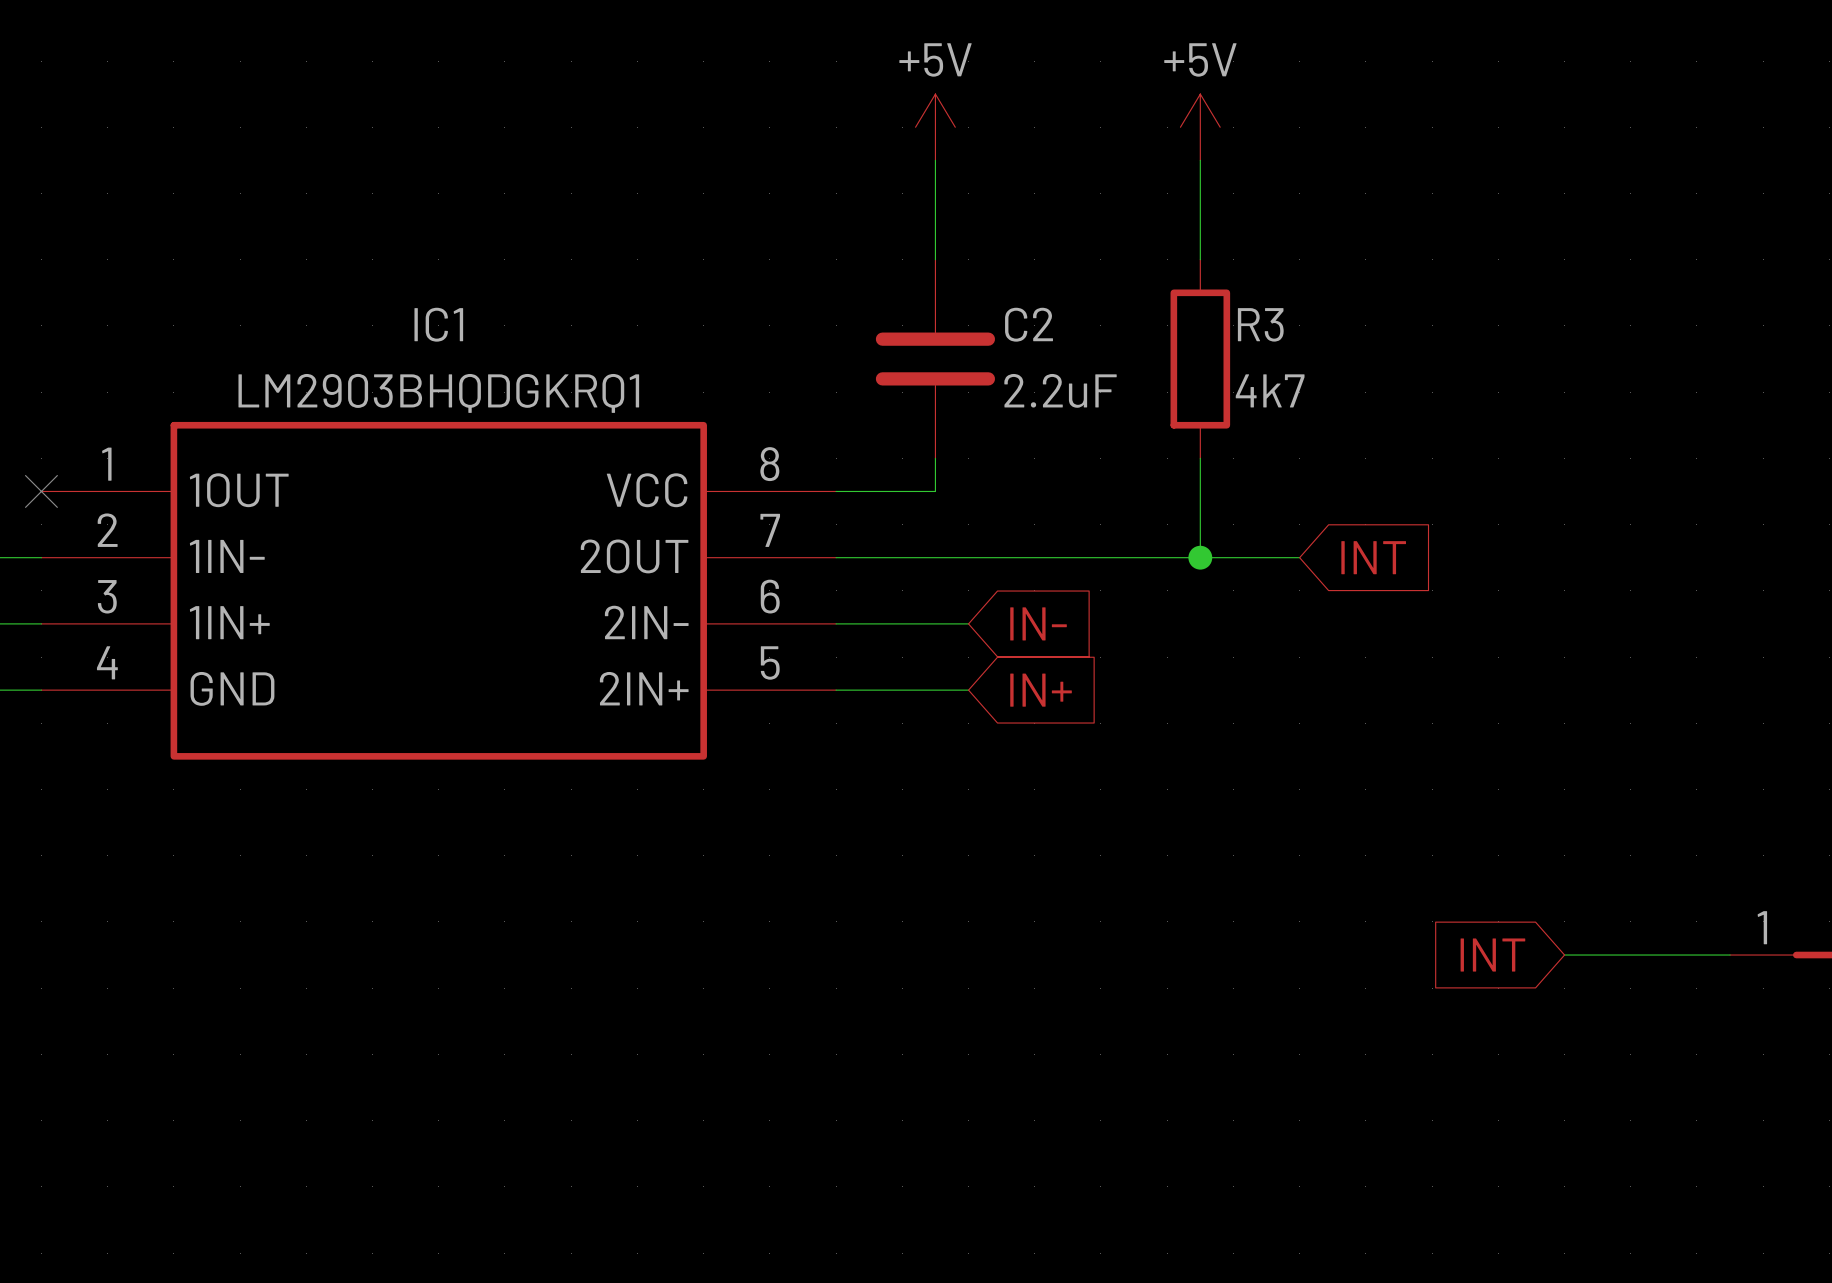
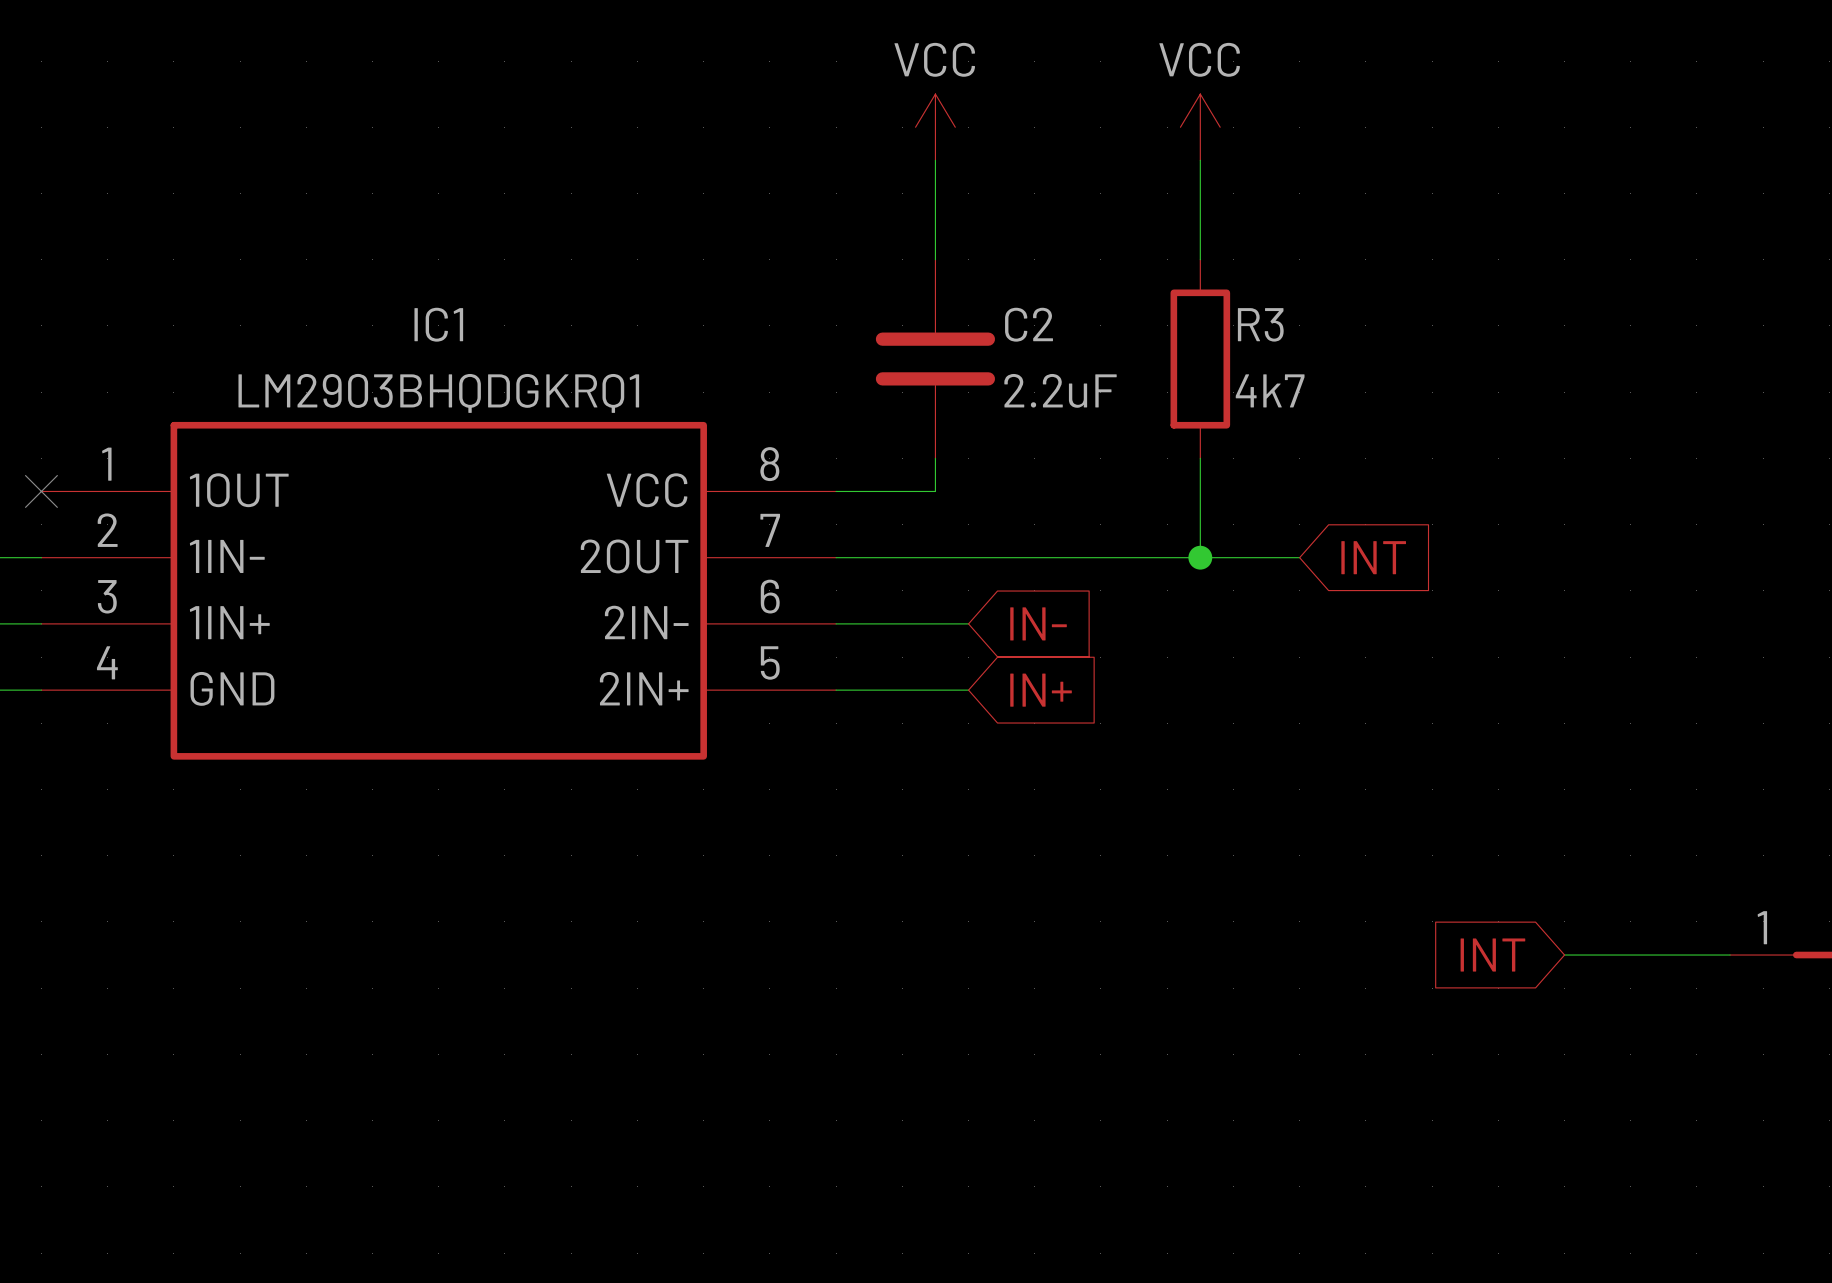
power symbol: +5V (935, 127) -> VCC (935, 127)
power symbol: +5V (1200, 127) -> VCC (1200, 127)

